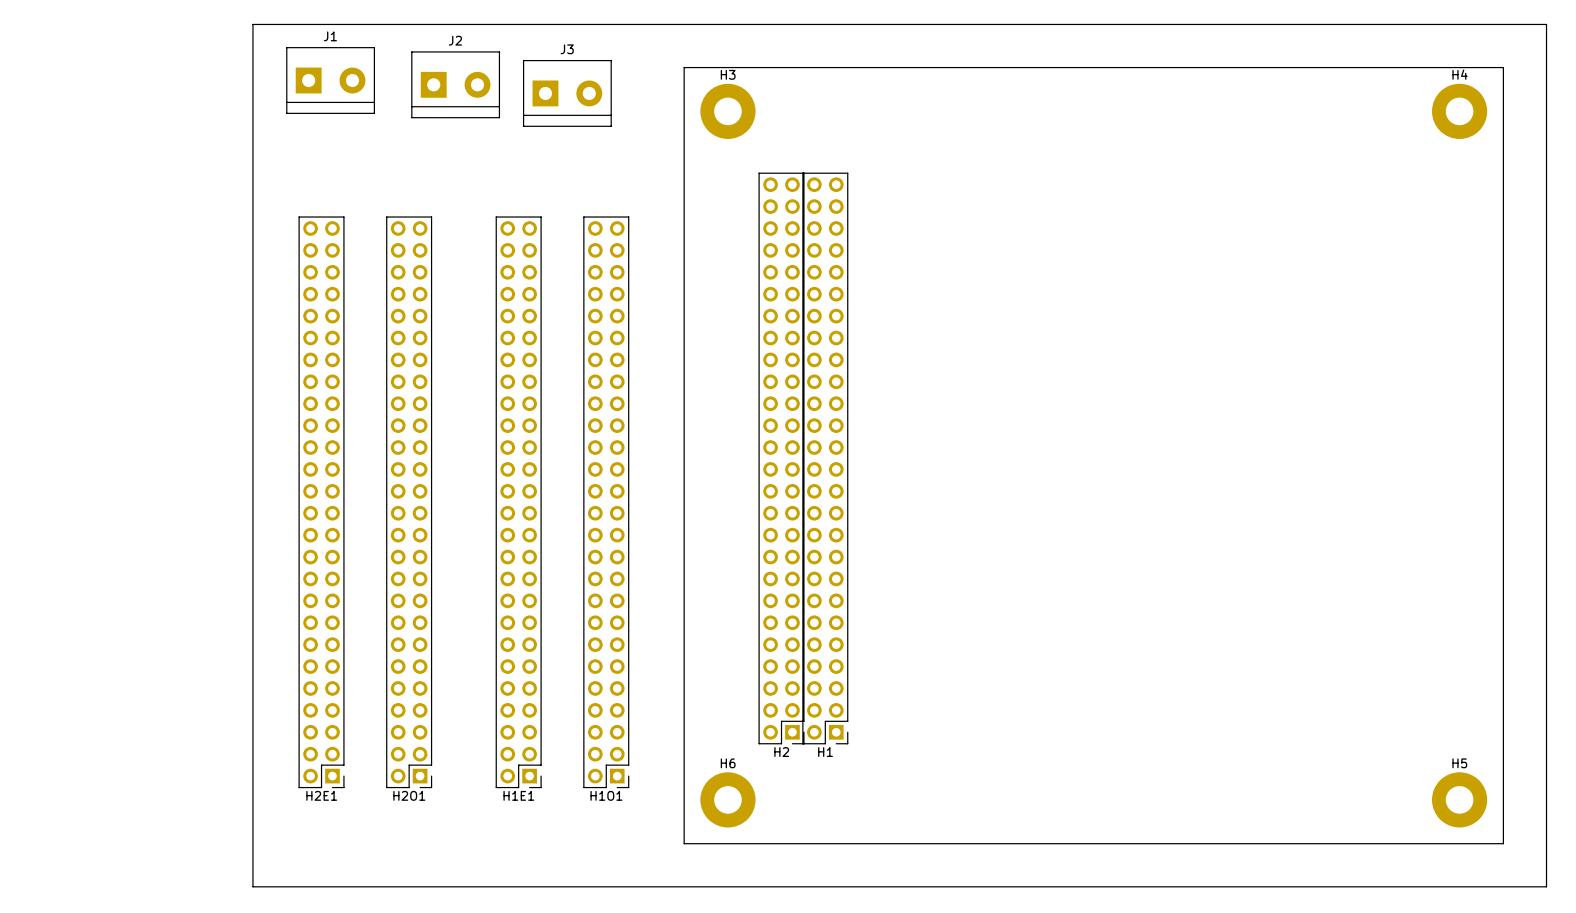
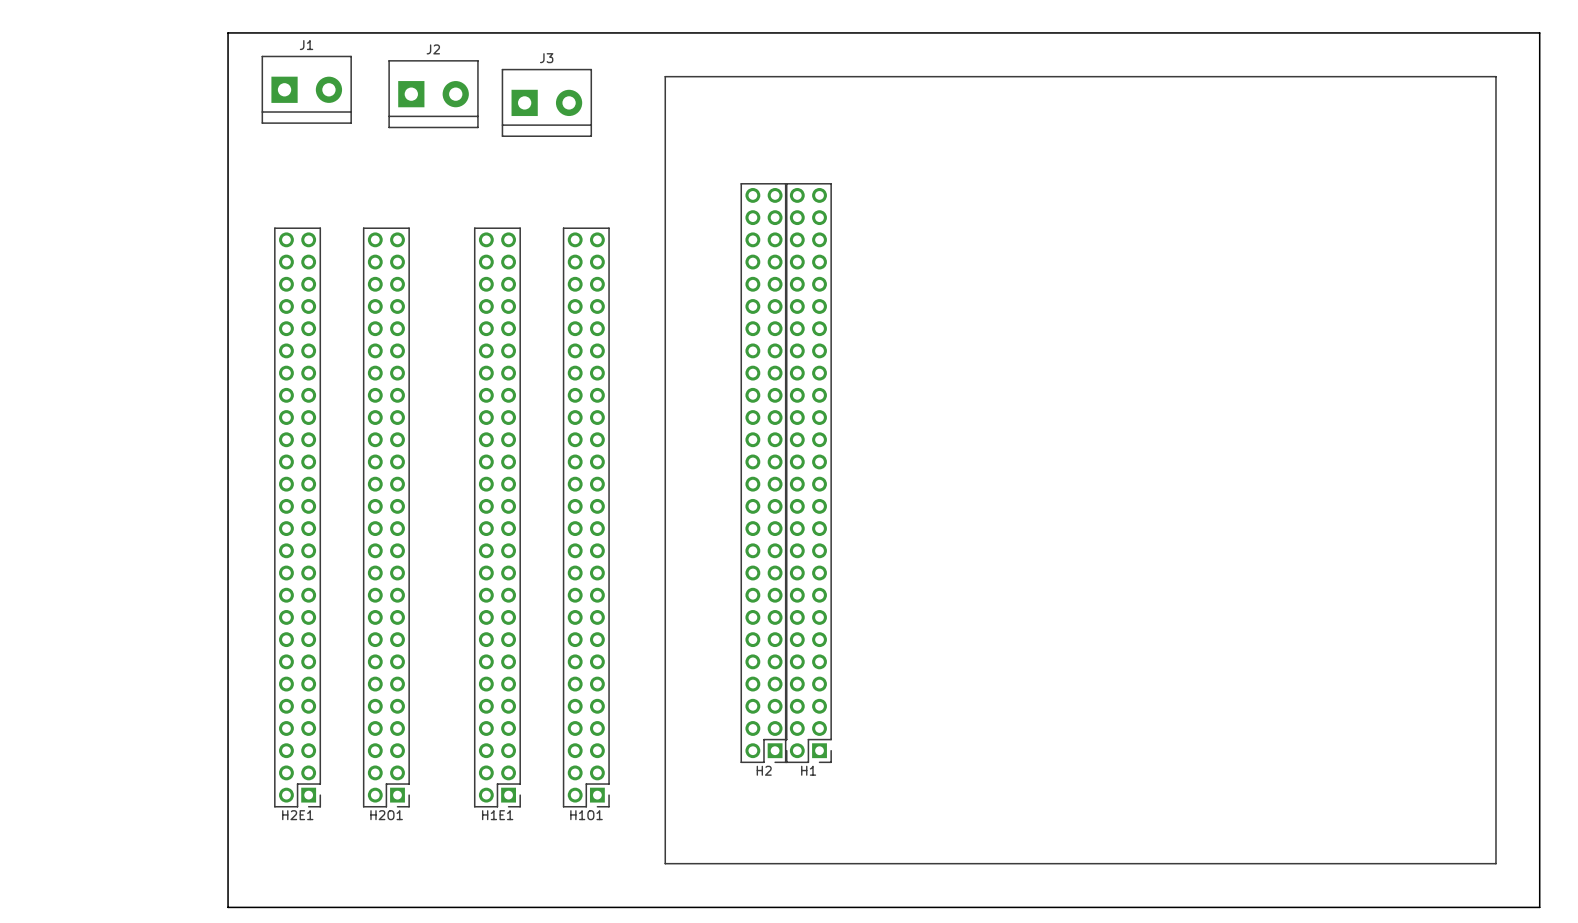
H3: (727, 111) -> none
H4: (1459, 111) -> none
H6: (727, 799) -> none
H5: (1459, 799) -> none

